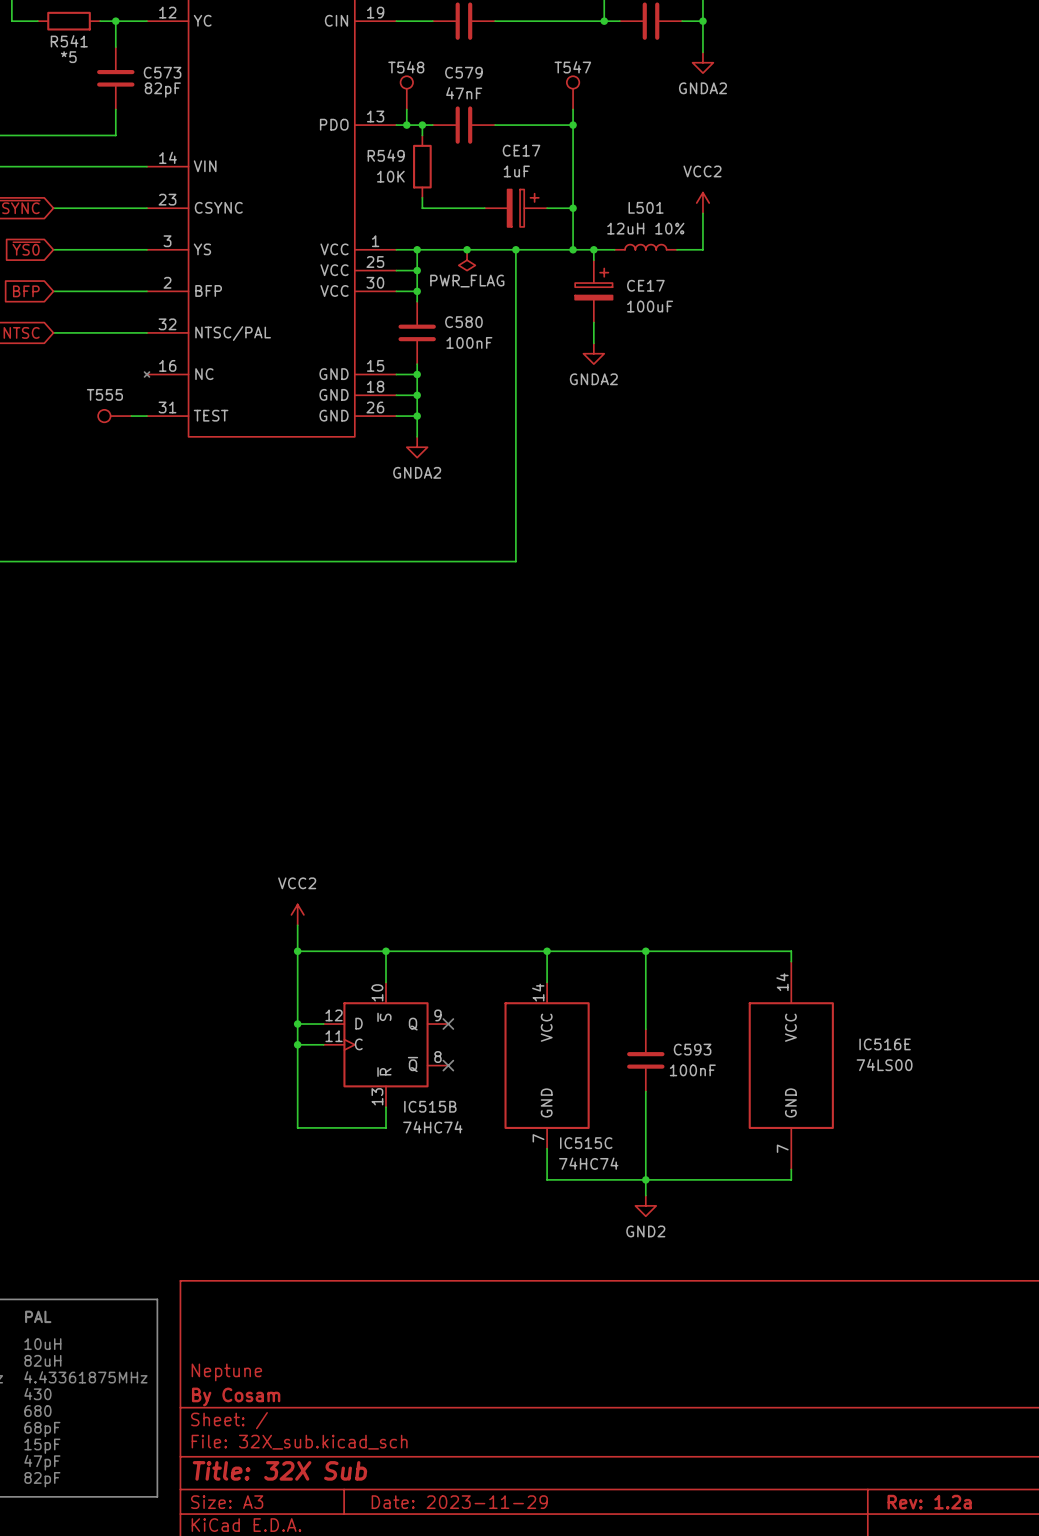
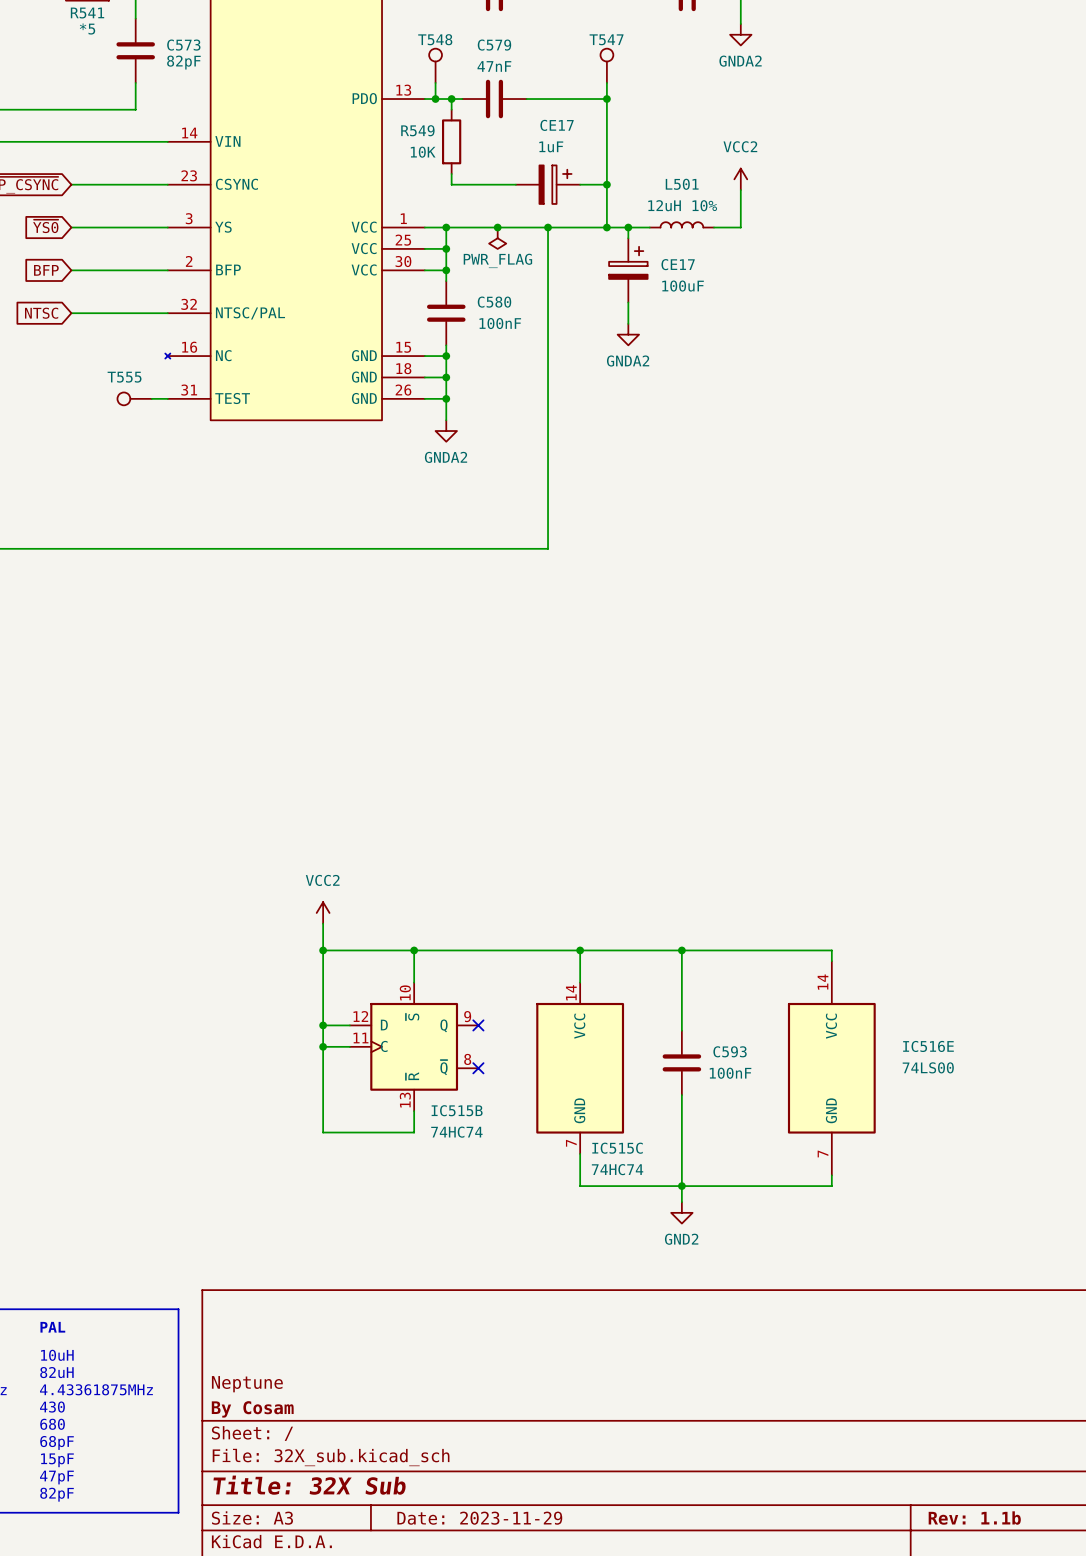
title block: Rev: 1.2a (929, 1502) -> Rev: 1.1b (974, 1518)

